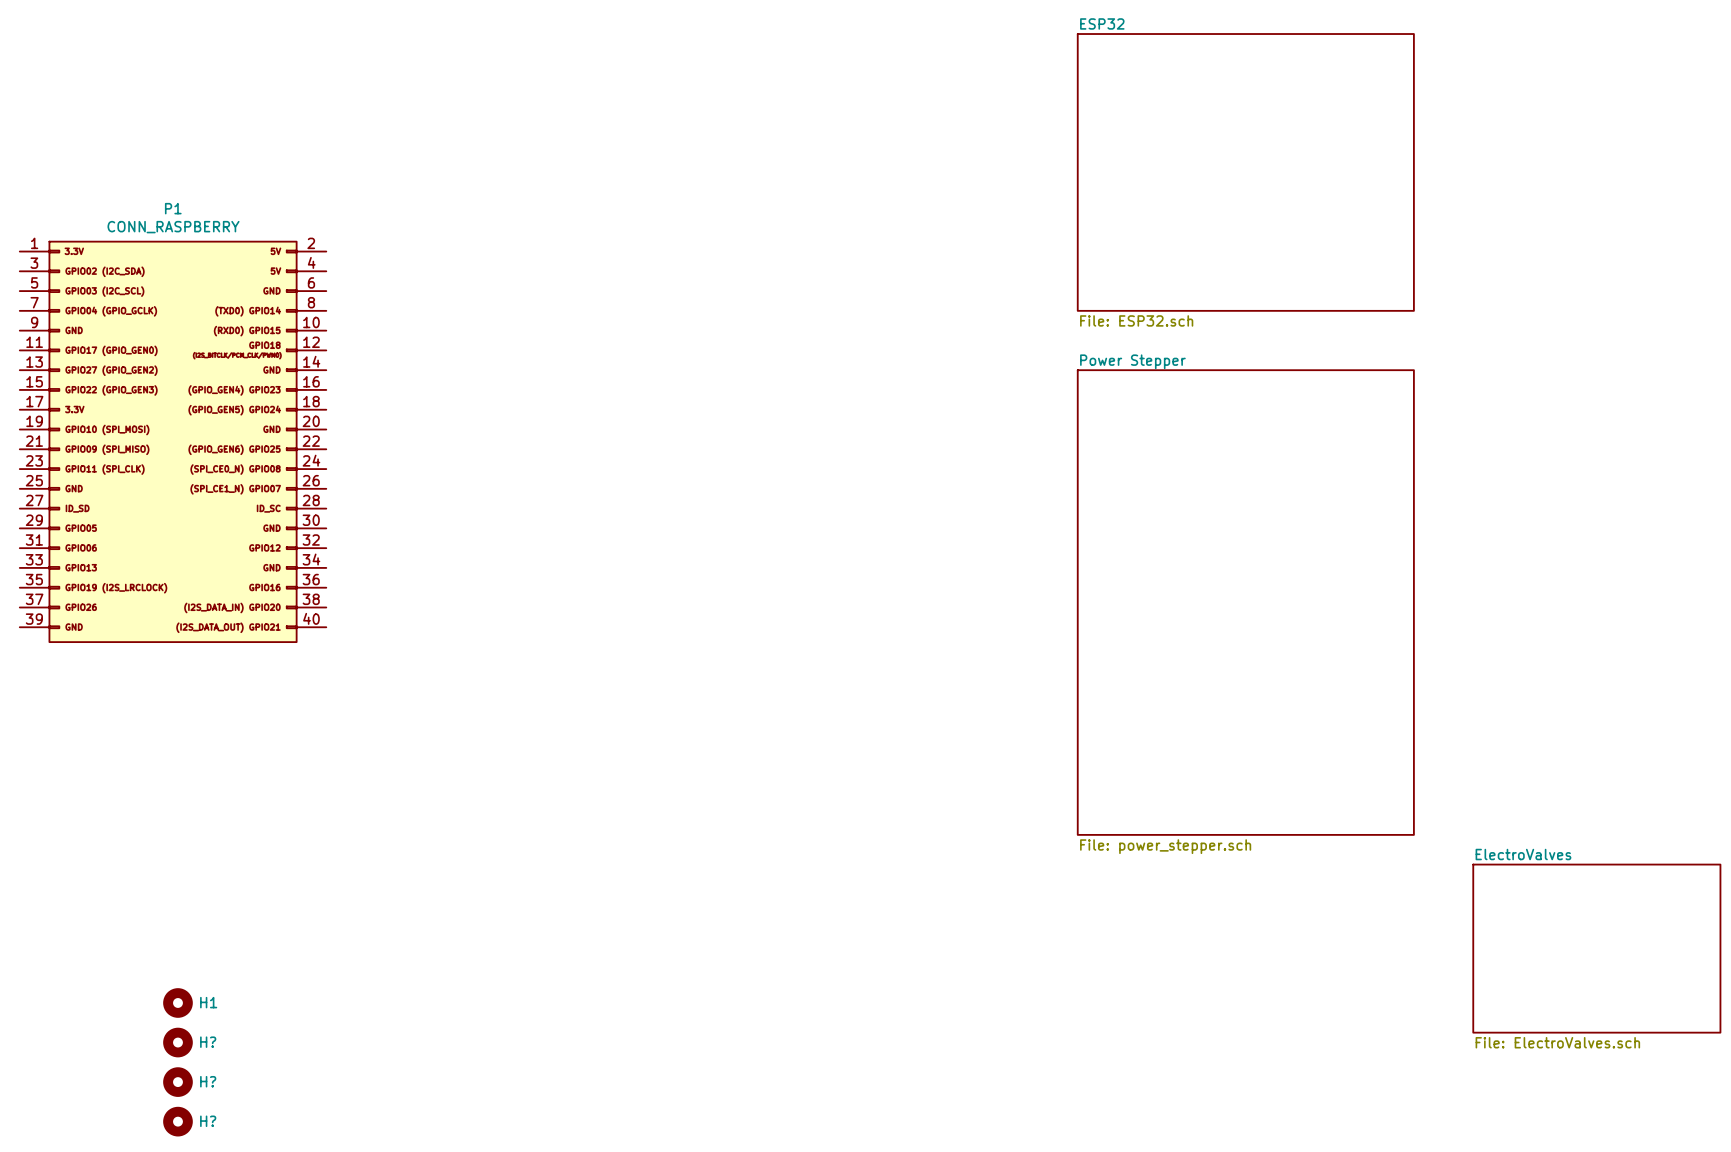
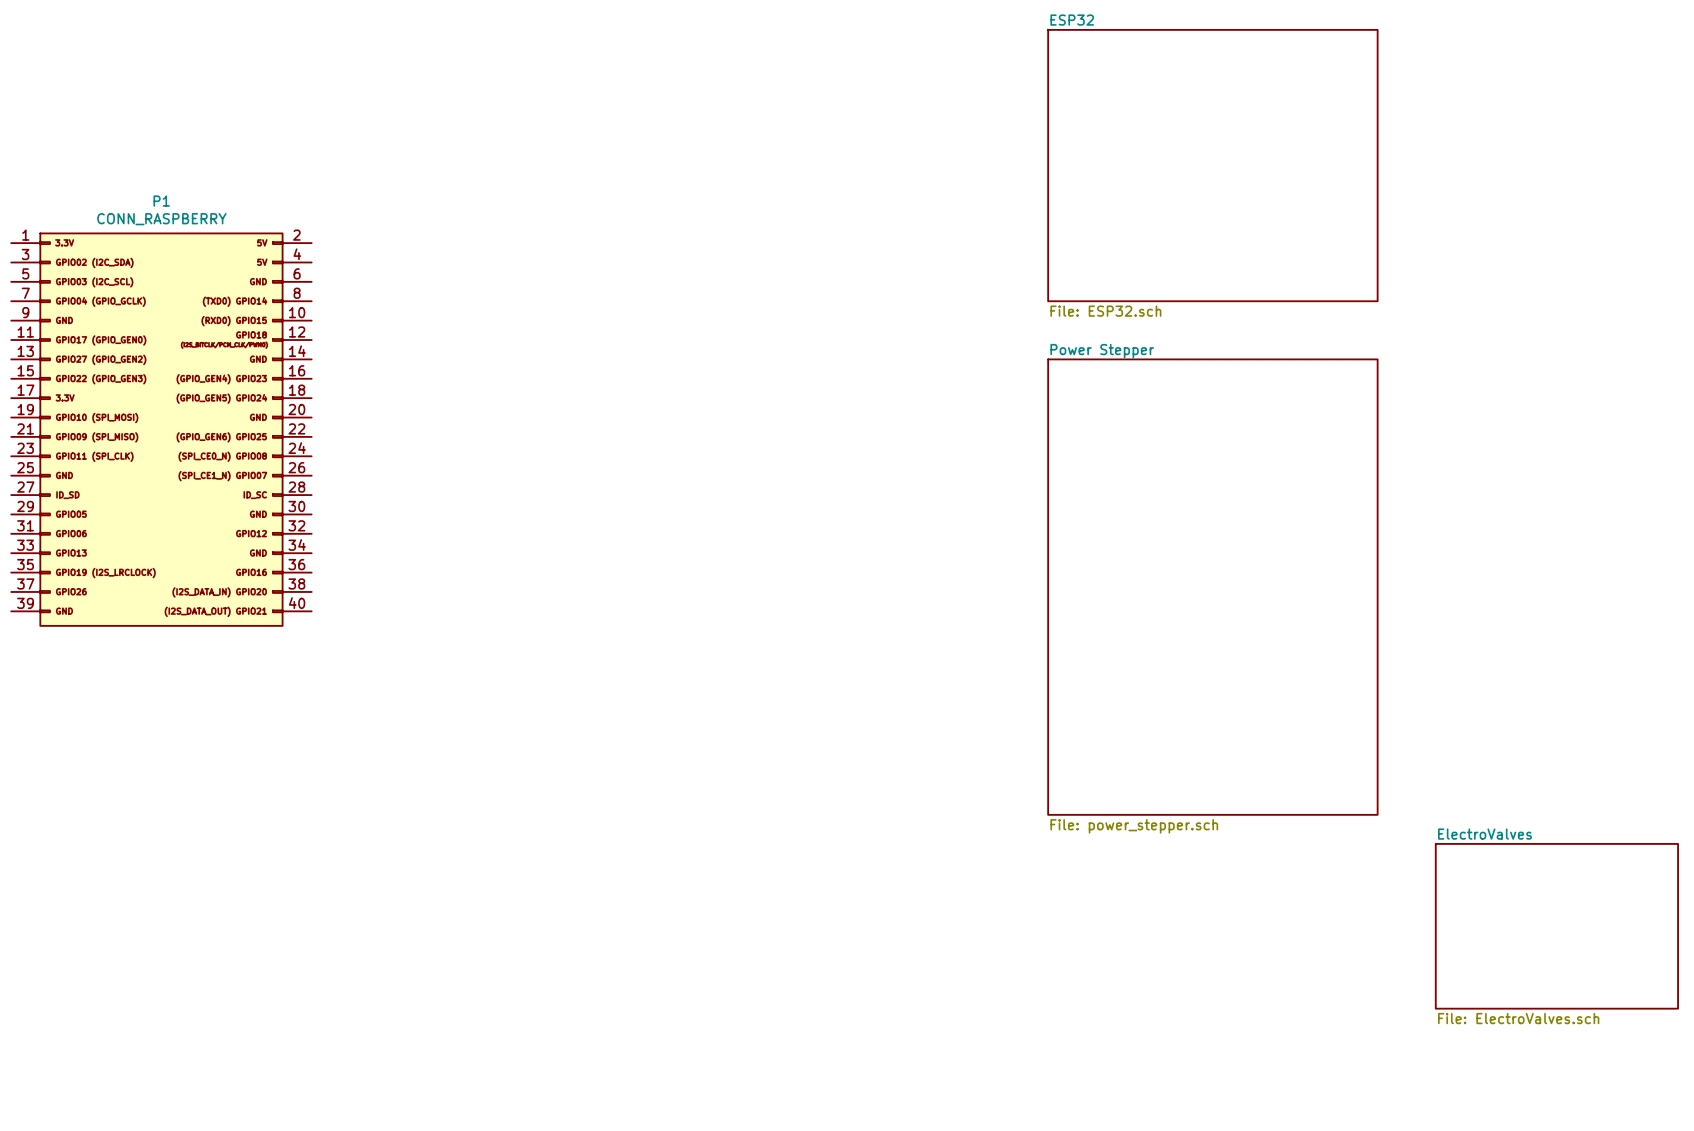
H1: (177, 1002) -> none
H?: (177, 1042) -> none
H?: (177, 1082) -> none
H?: (177, 1121) -> none

